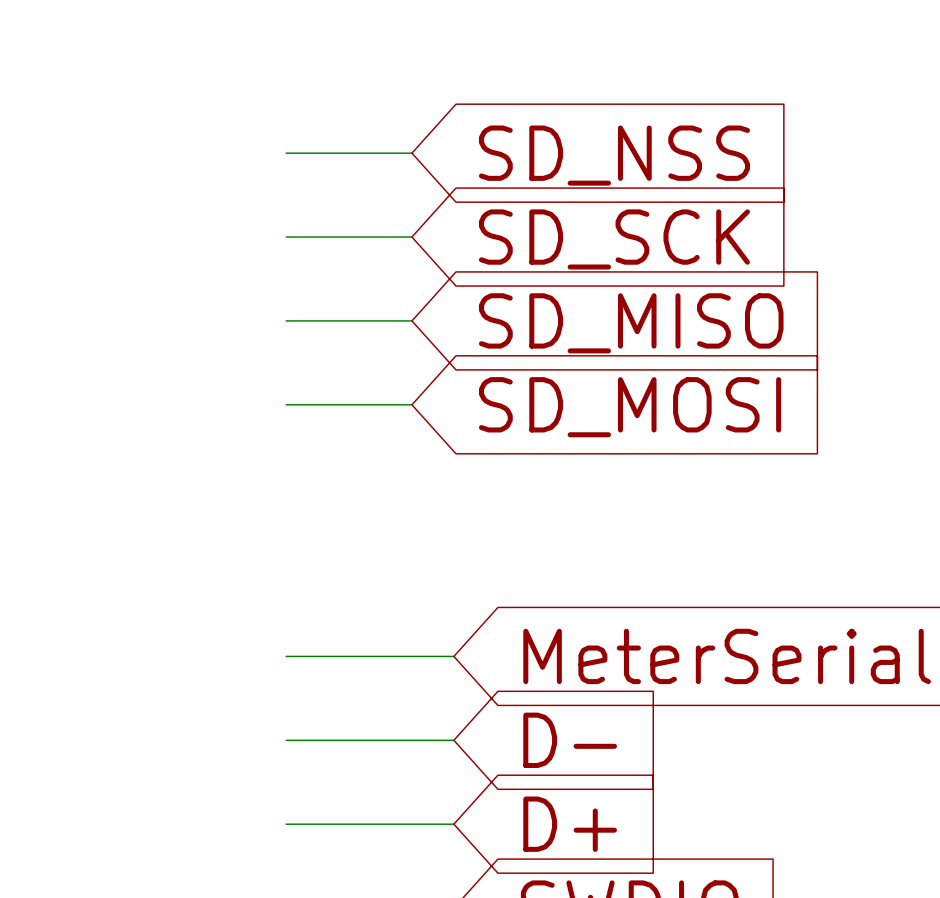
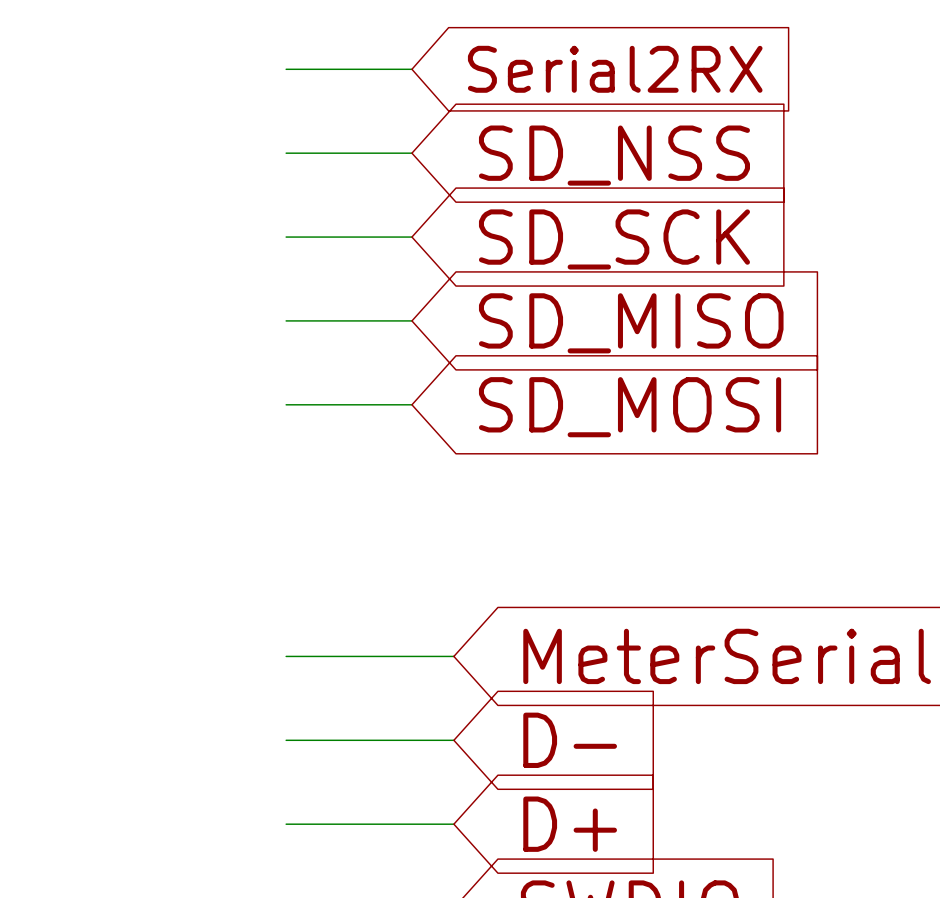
wire: none -> (286, 69) (411, 69)
global label: none -> Serial2RX (615, 69)

